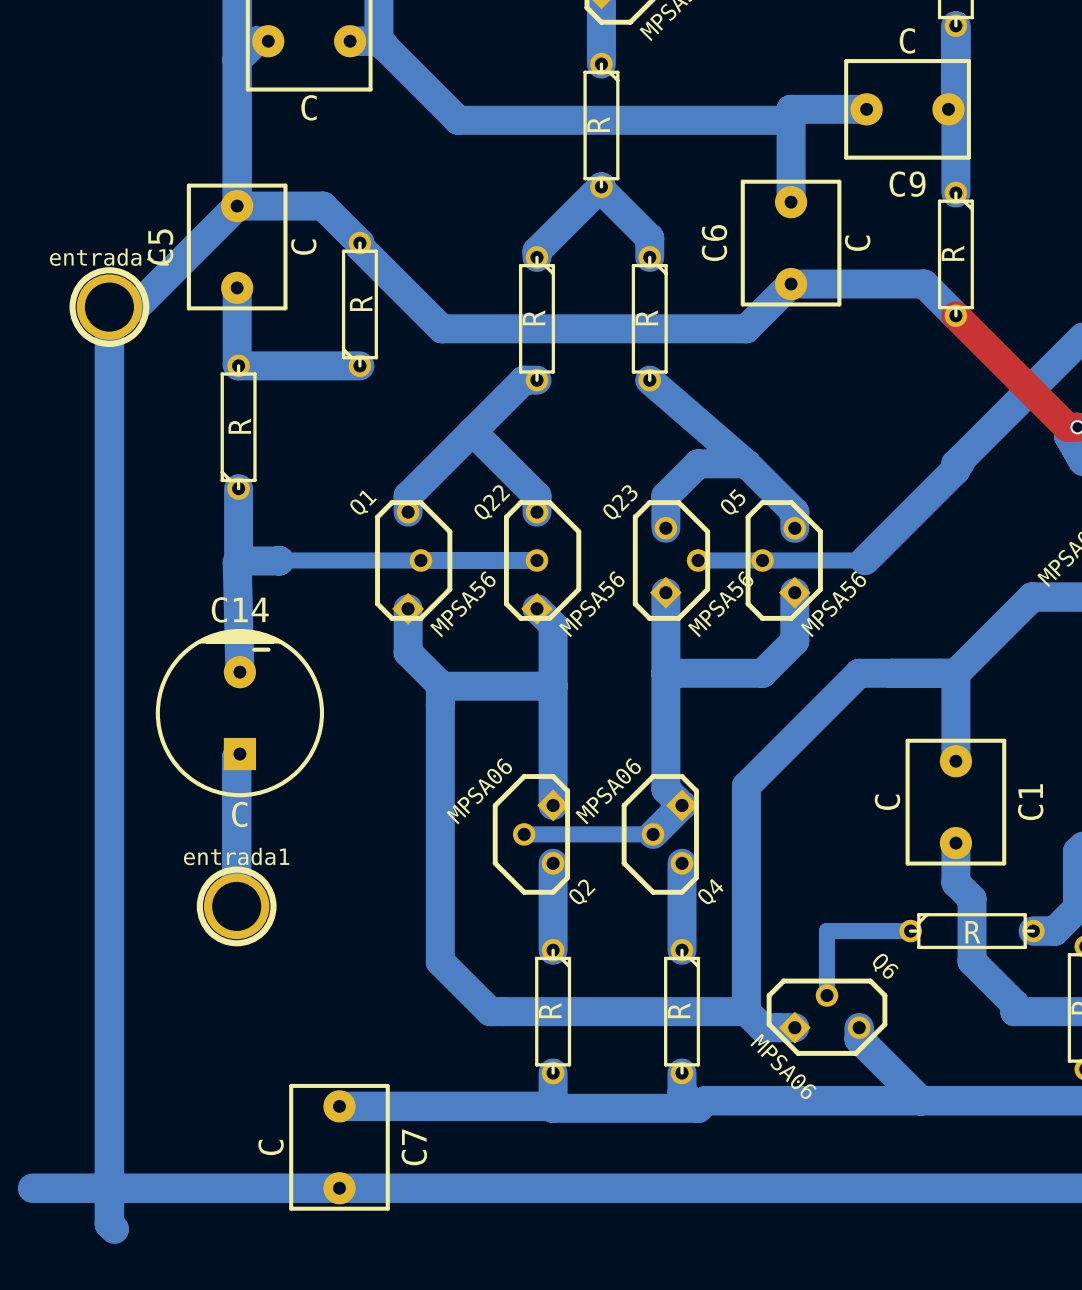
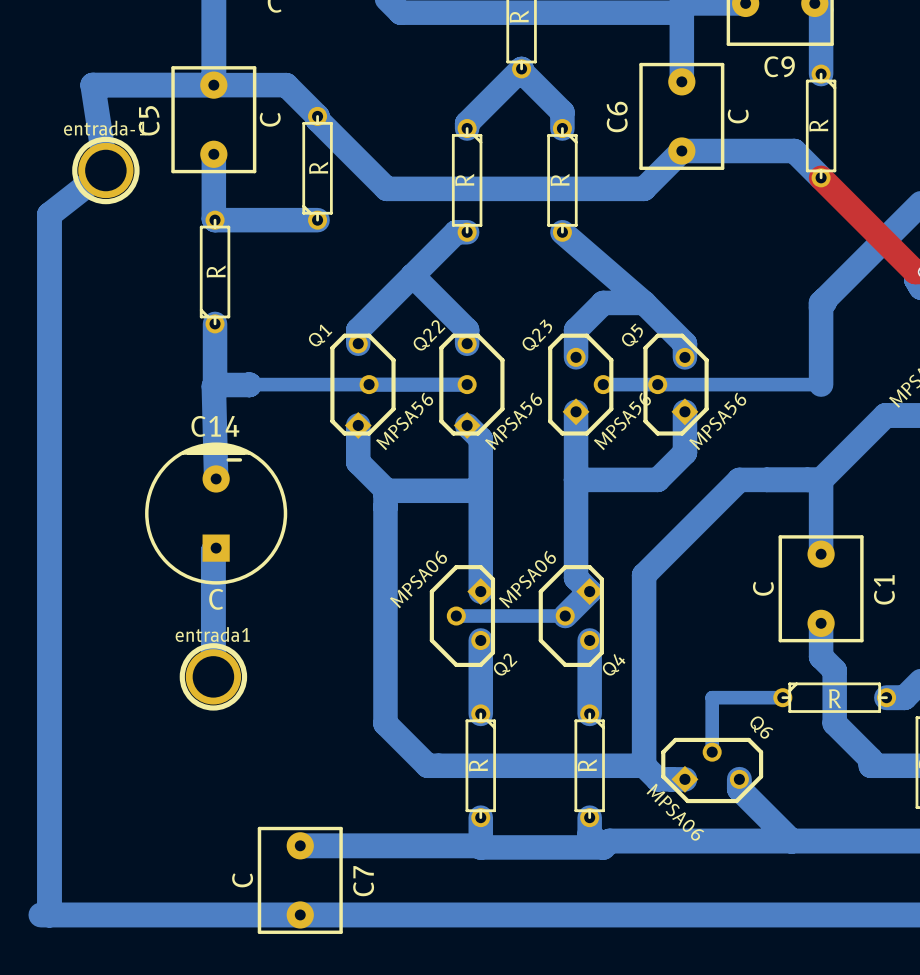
bottom track: (237, 206) (136, 307) (109, 307) (109, 1224) (114, 1229) -> (213, 85) (92, 85) (105, 170) (49, 214) (49, 914)
bottom track: (955, 469) (864, 560) -> (821, 307) (821, 384) (744, 384)

